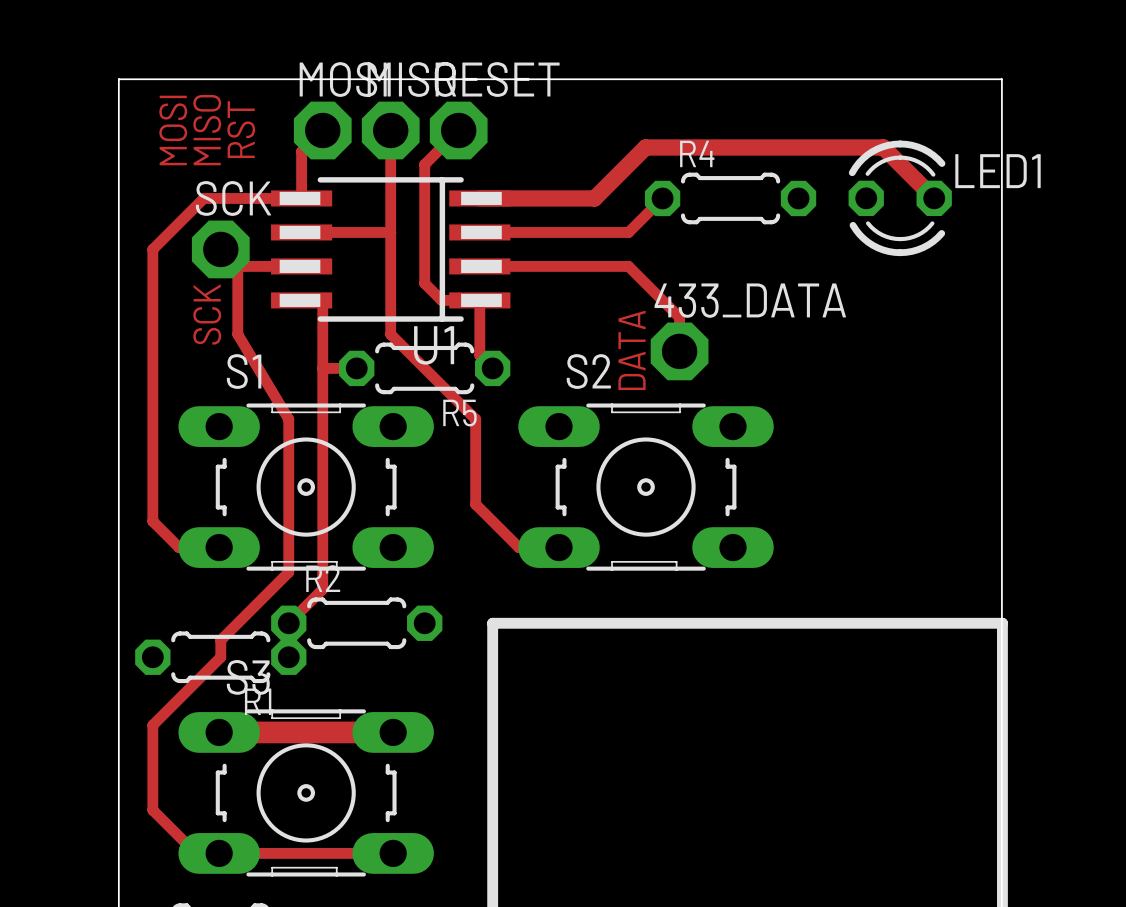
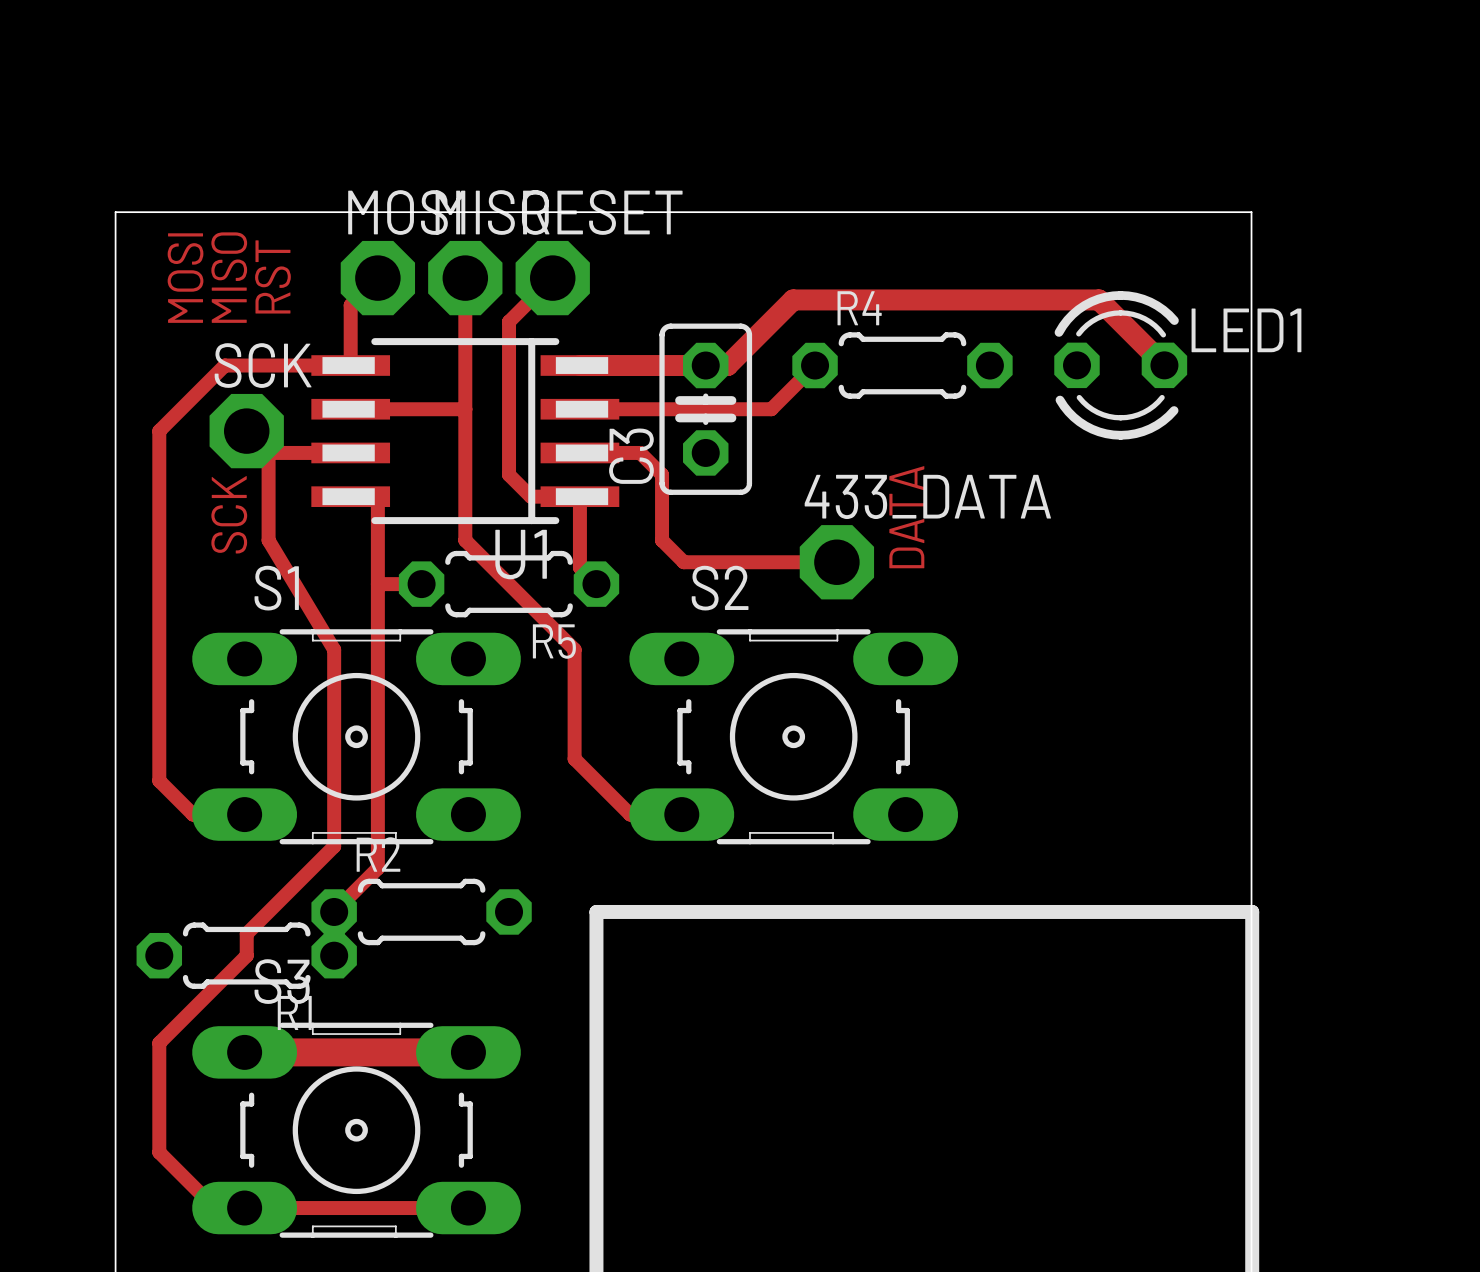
C3: none -> (705, 409)
track: (526, 266) (628, 266) (679, 317) (679, 351) -> (640, 452) (662, 474) (662, 540) (683, 562) (836, 562)
text position: DATA (632, 350) -> DATA (906, 517)

